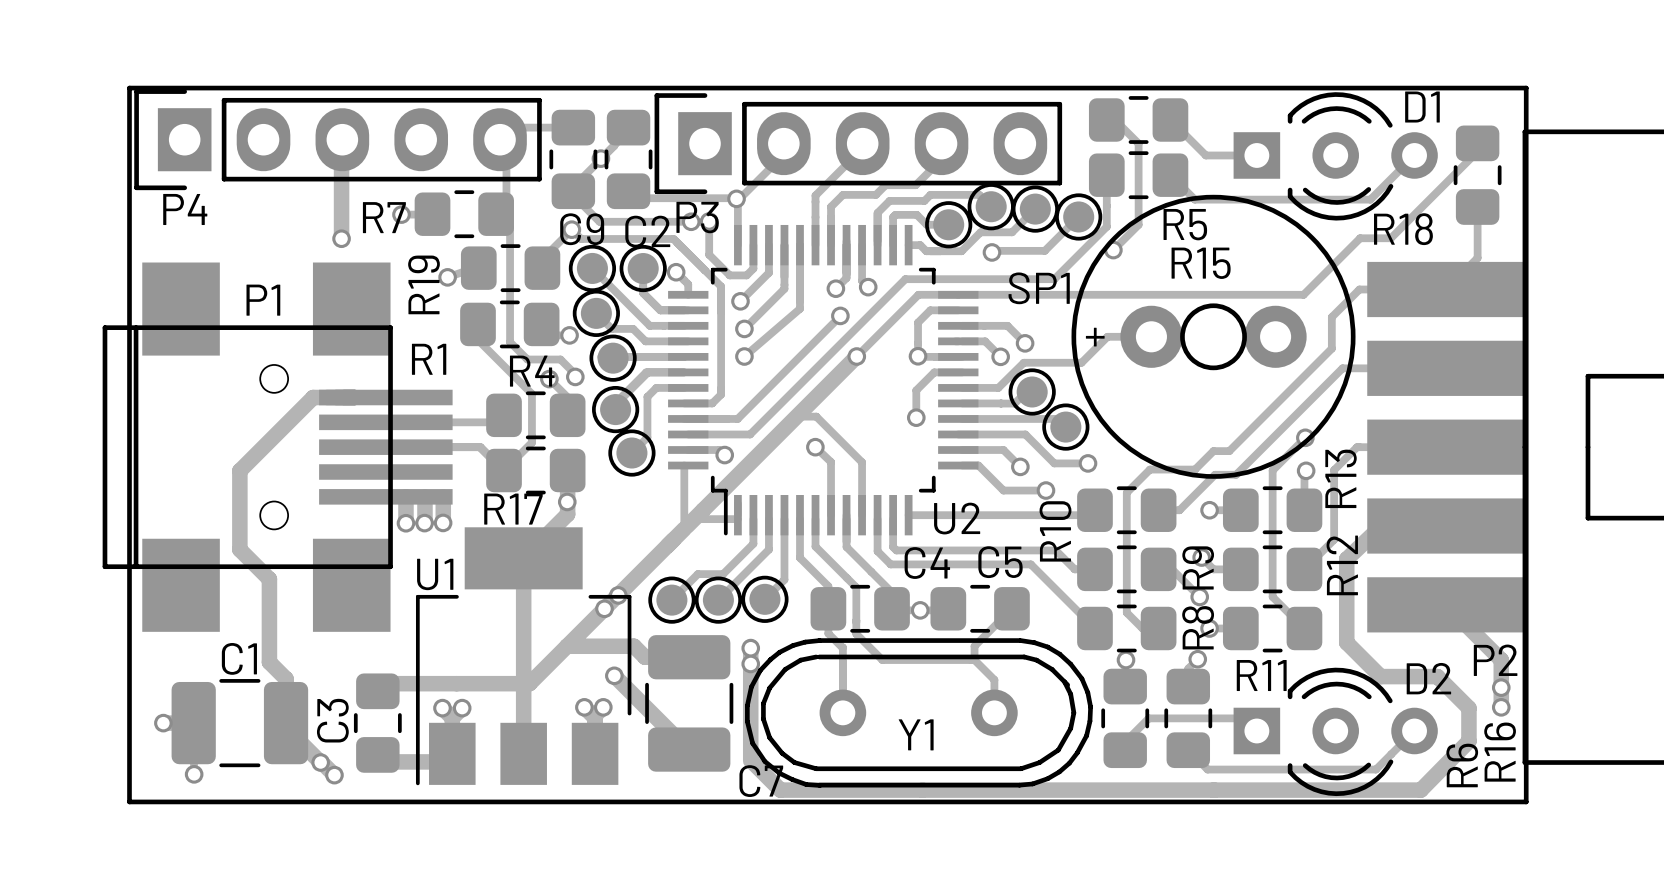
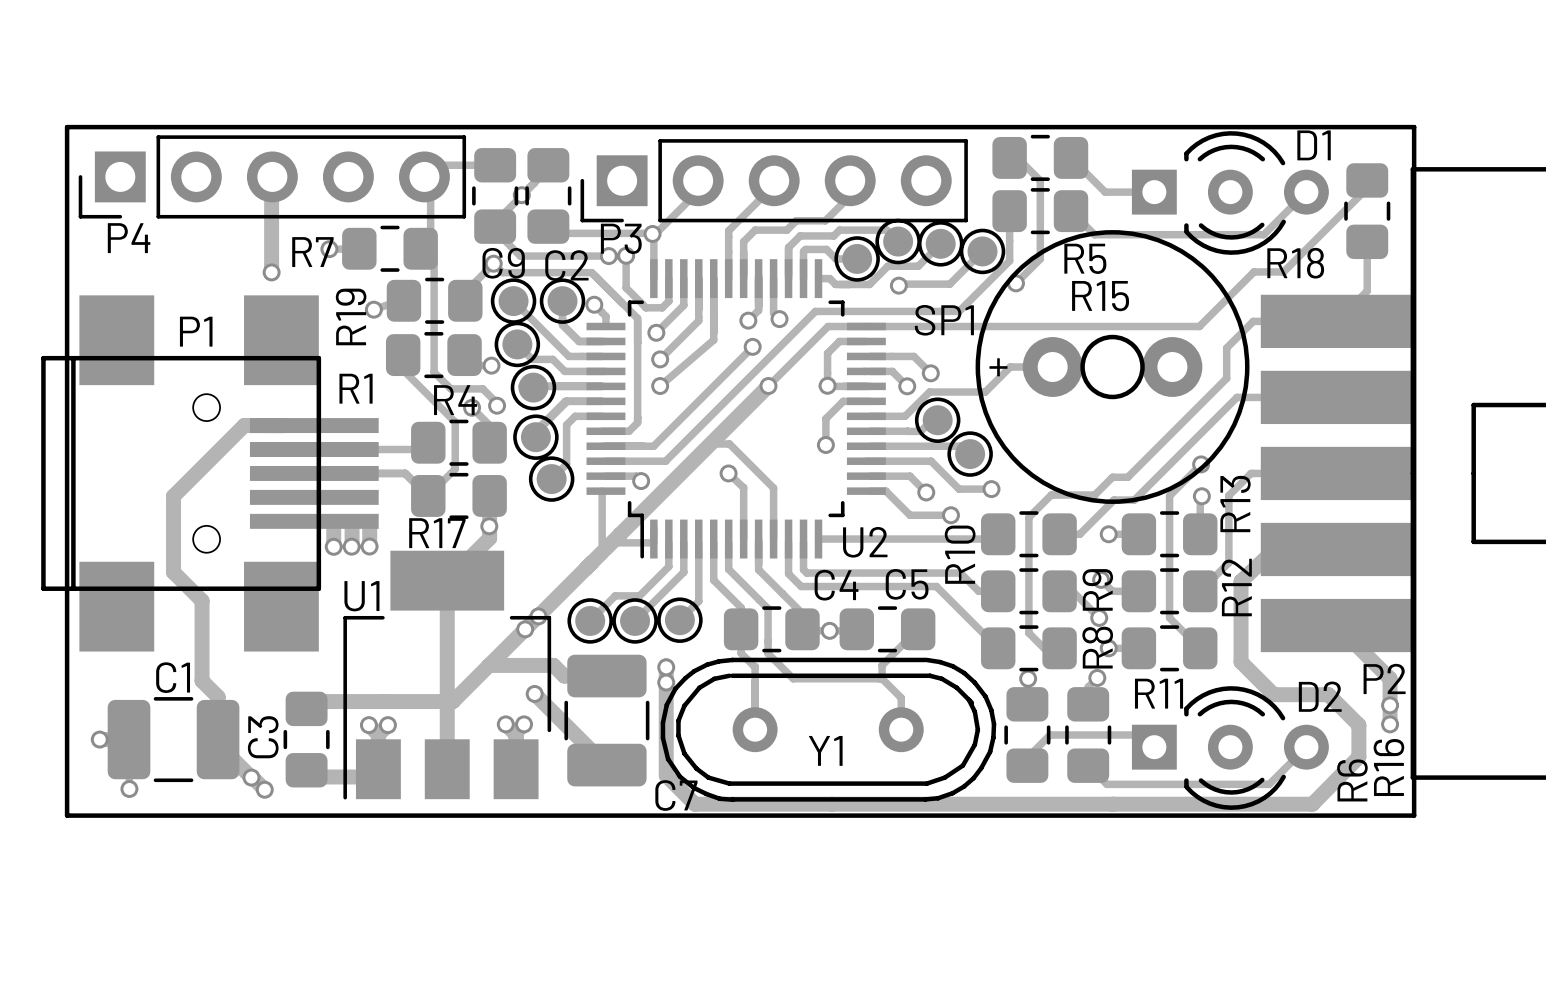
P4 footprint: [134, 89, 542, 191] -> [78, 135, 467, 219]
P3 footprint: [654, 93, 1063, 195] -> [580, 139, 968, 223]

